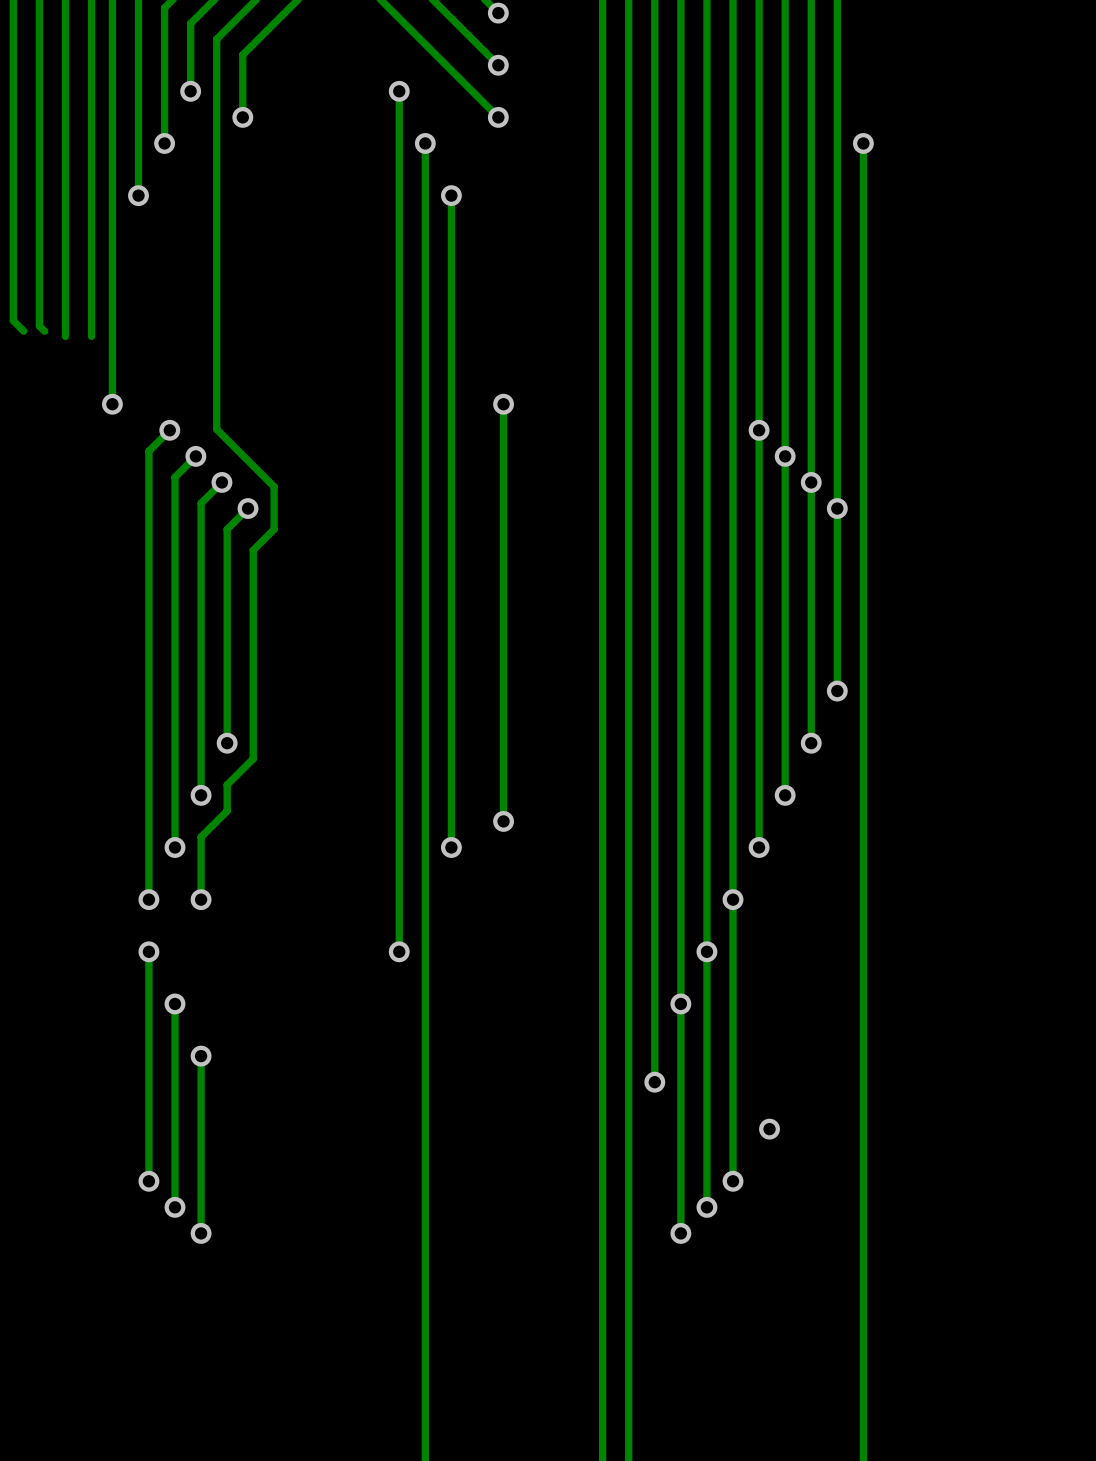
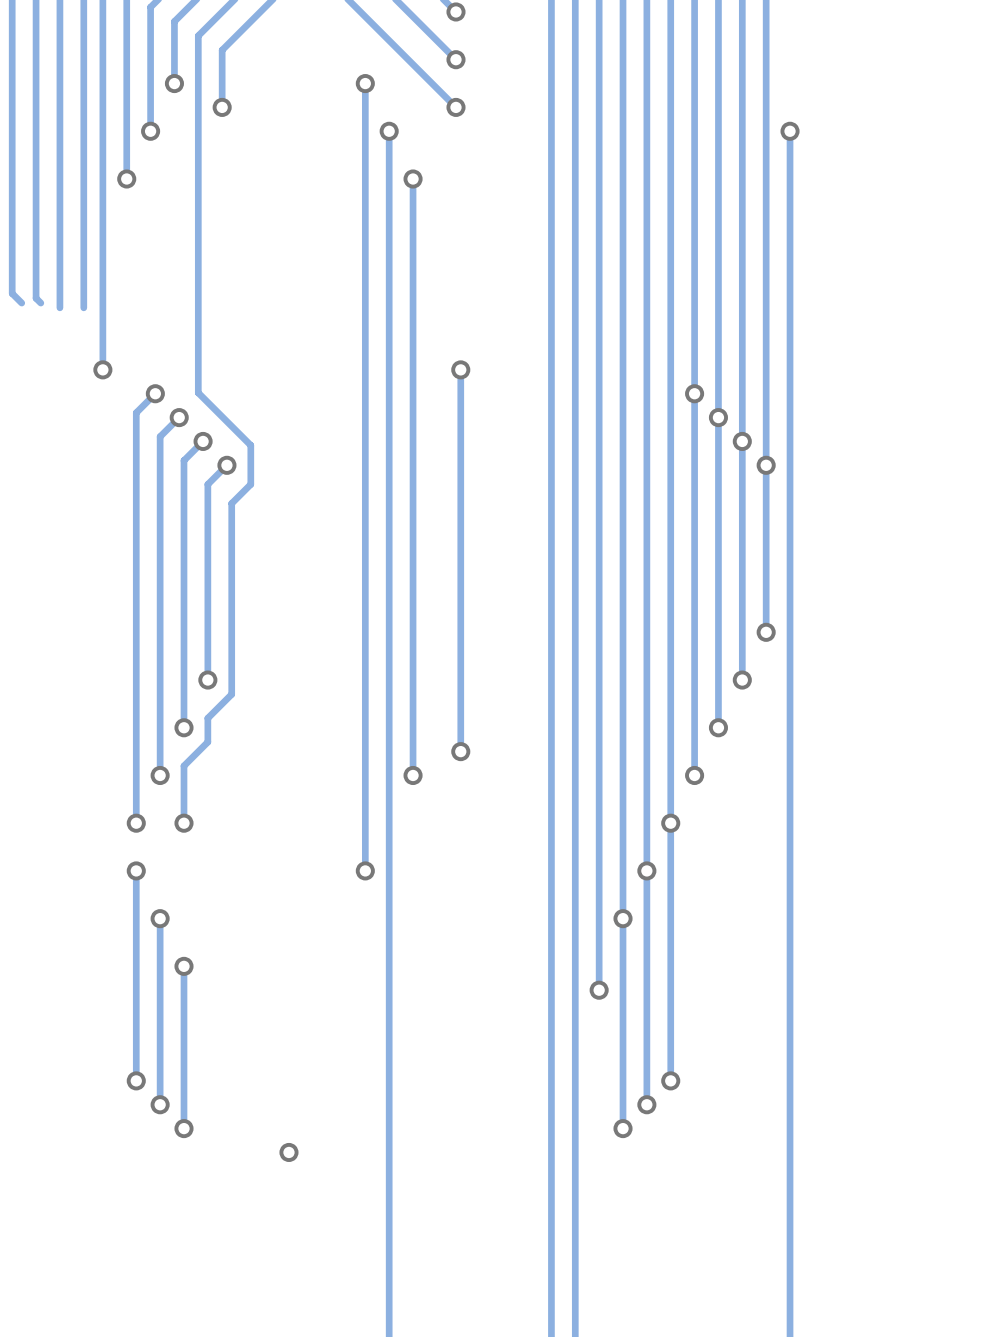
via: (769, 1129) -> none
via: none -> (288, 1152)

